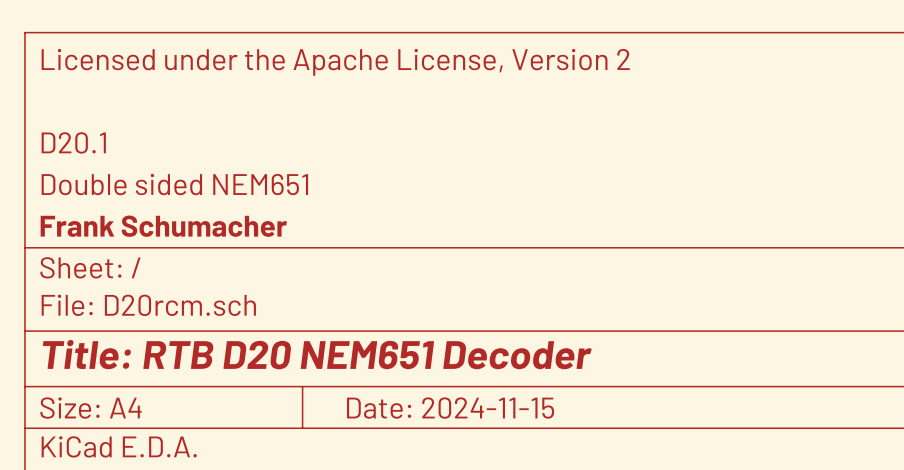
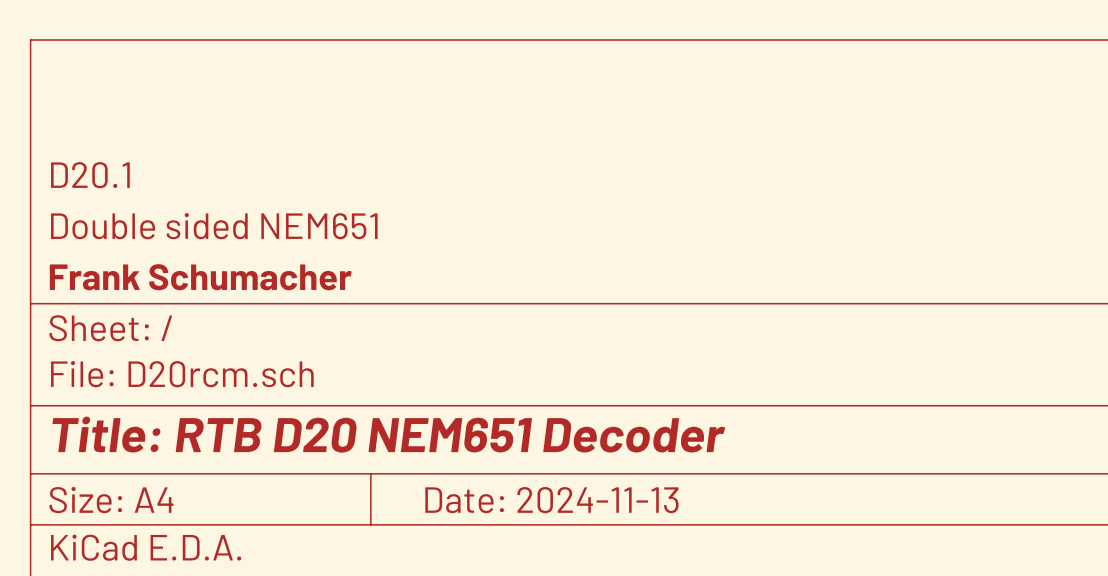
title block: Licensed under the Apache License, Version 2 (335, 62) -> none
title block: Date: 2024-11-15 (450, 408) -> Date: 2024-11-13 (551, 500)

